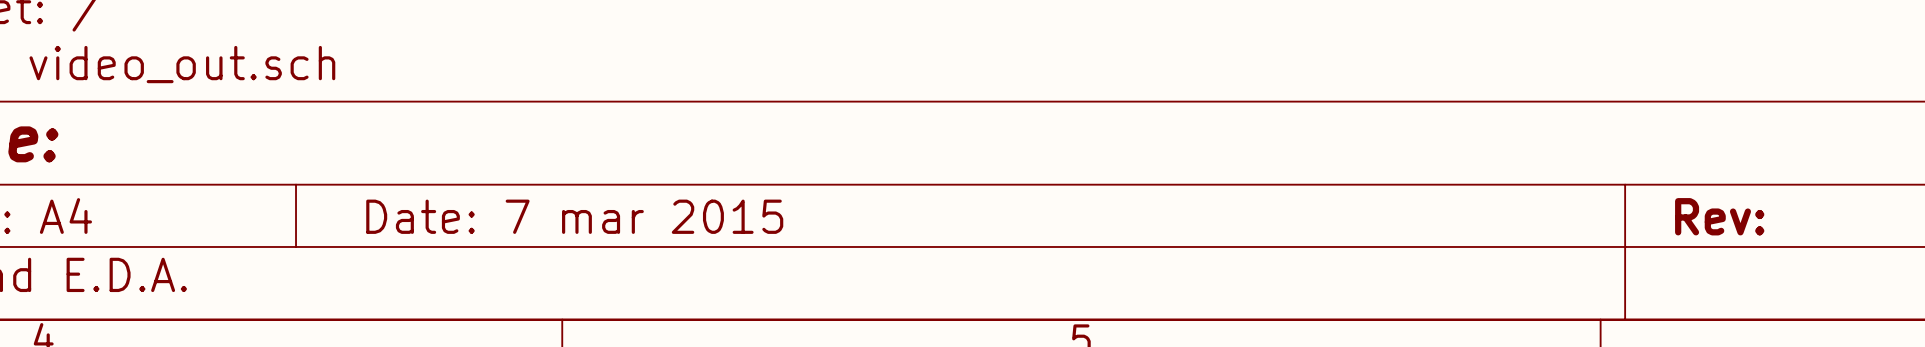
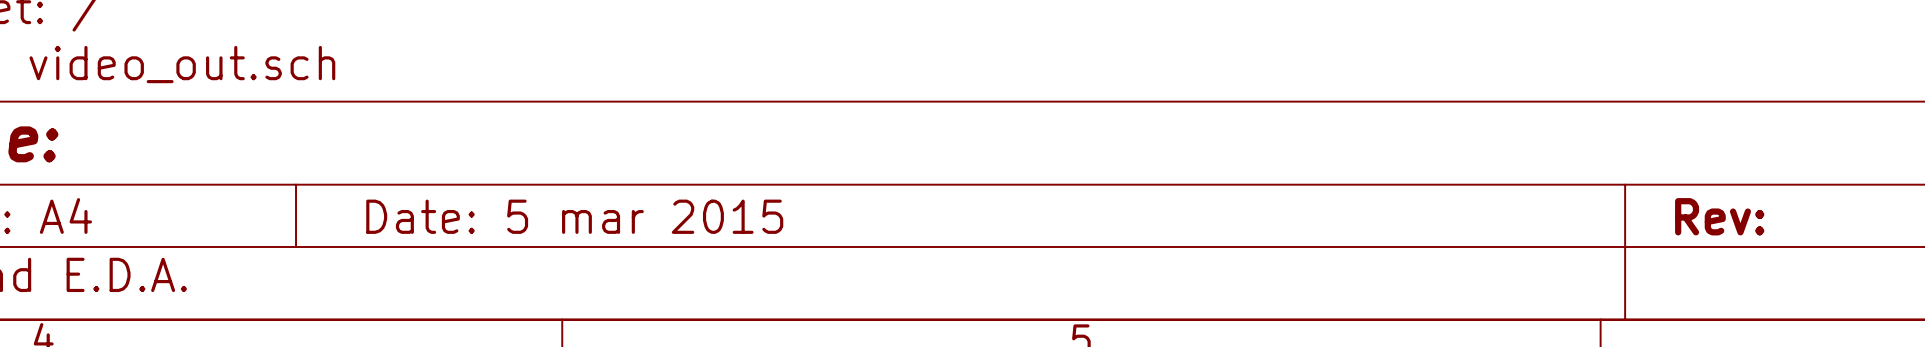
title block: Date: 7 mar 2015 (574, 216) -> Date: 5 mar 2015 (574, 216)

